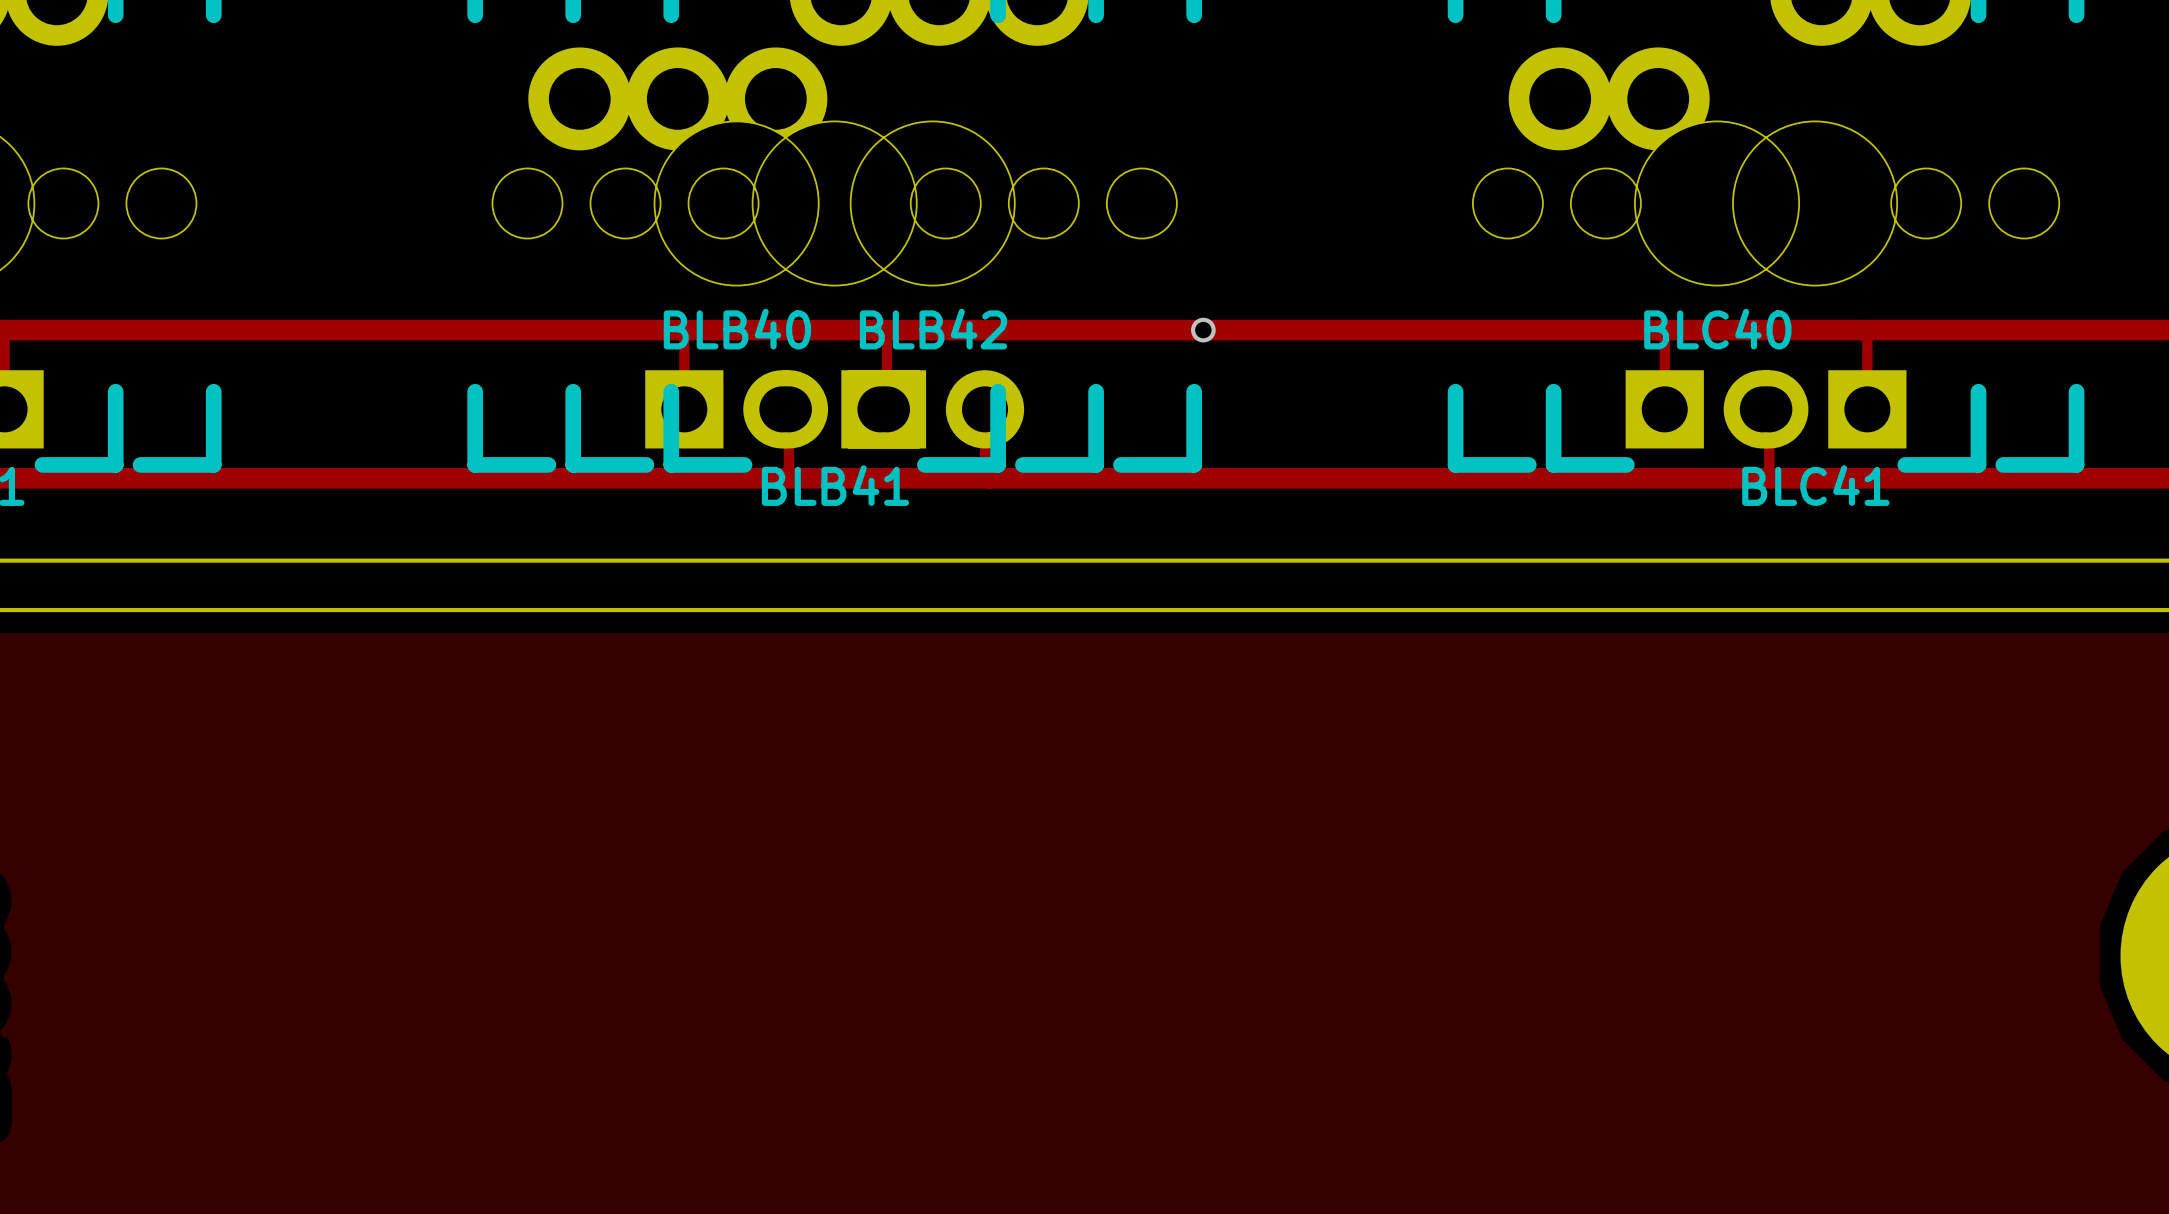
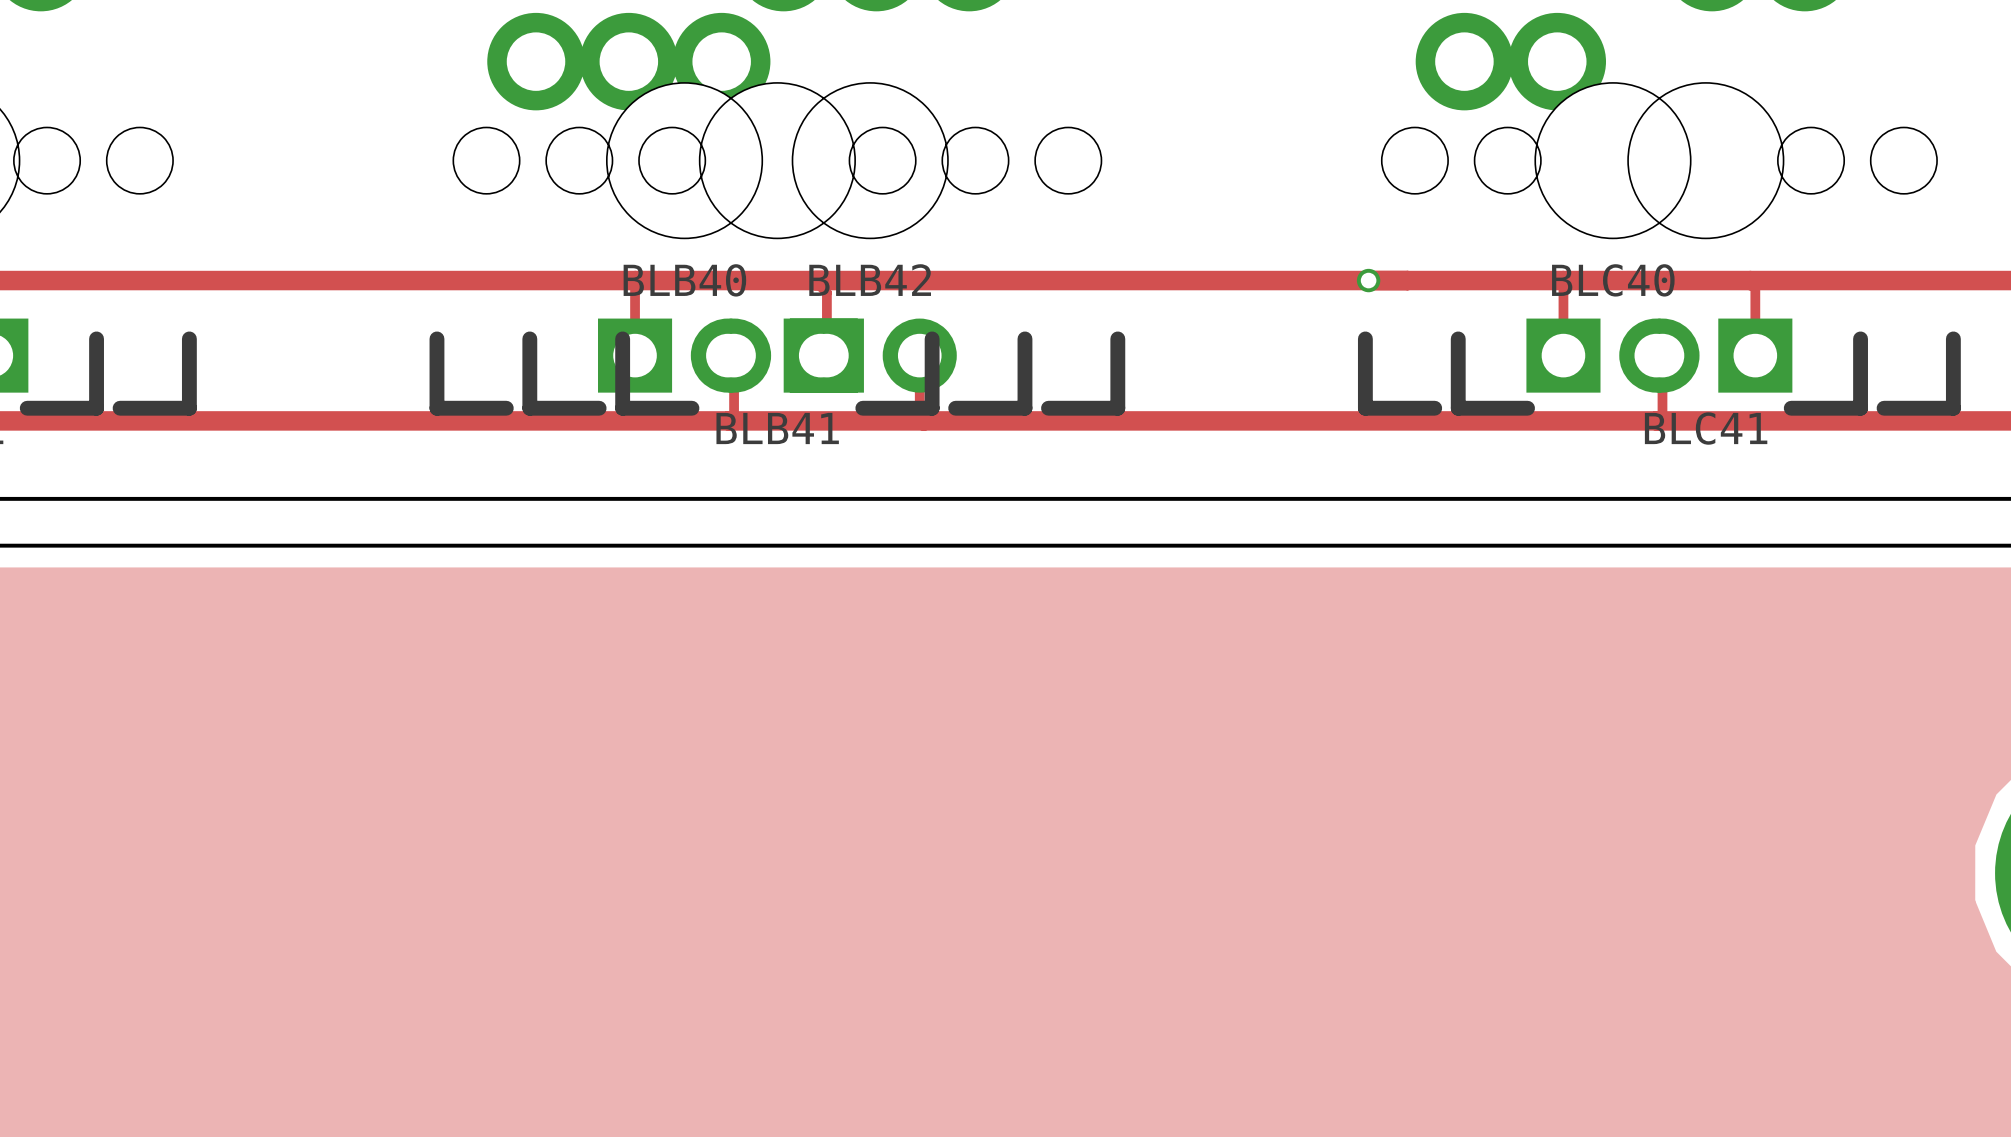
via: (1203, 330) -> none
via: none -> (1368, 280)

